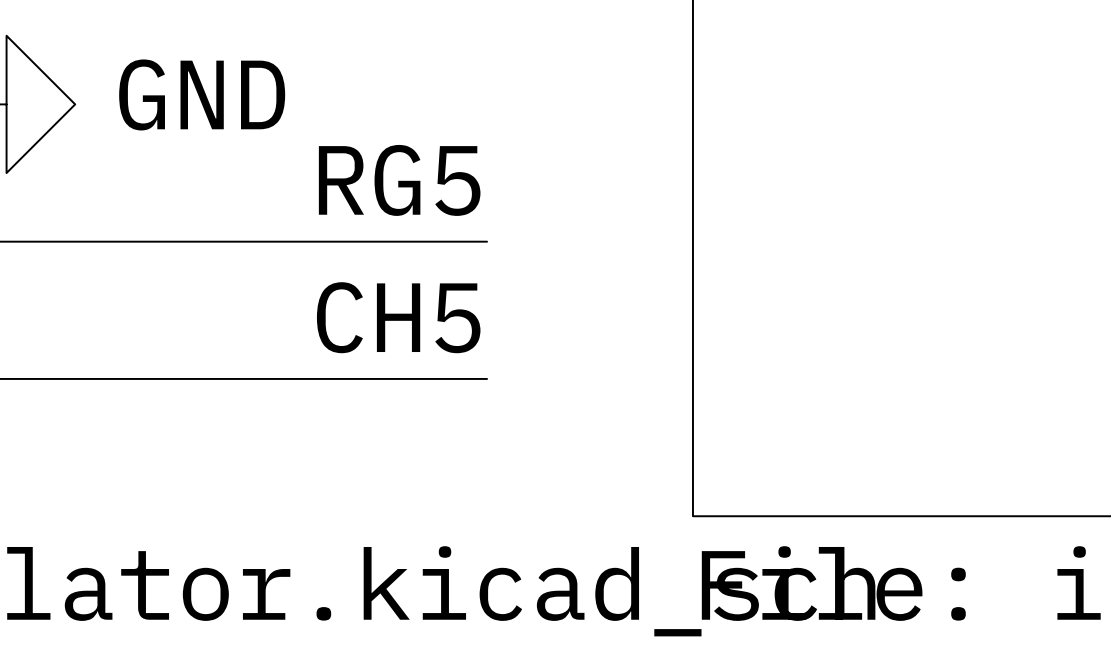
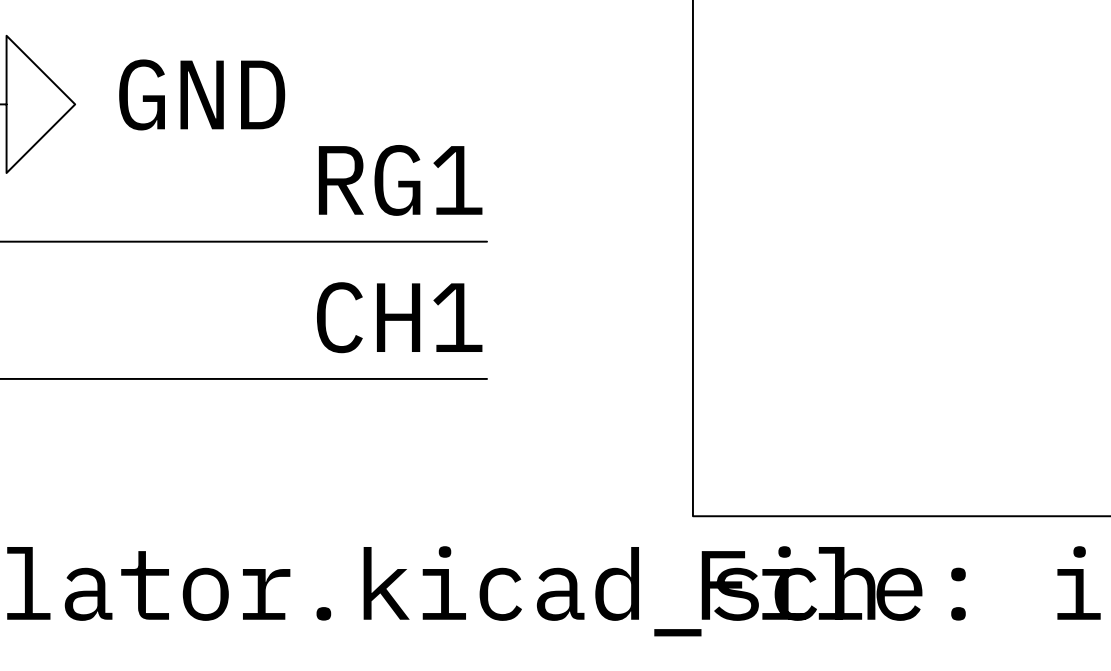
label: RG5 (399, 180) -> RG1 (400, 180)
label: CH5 (398, 317) -> CH1 (399, 317)

